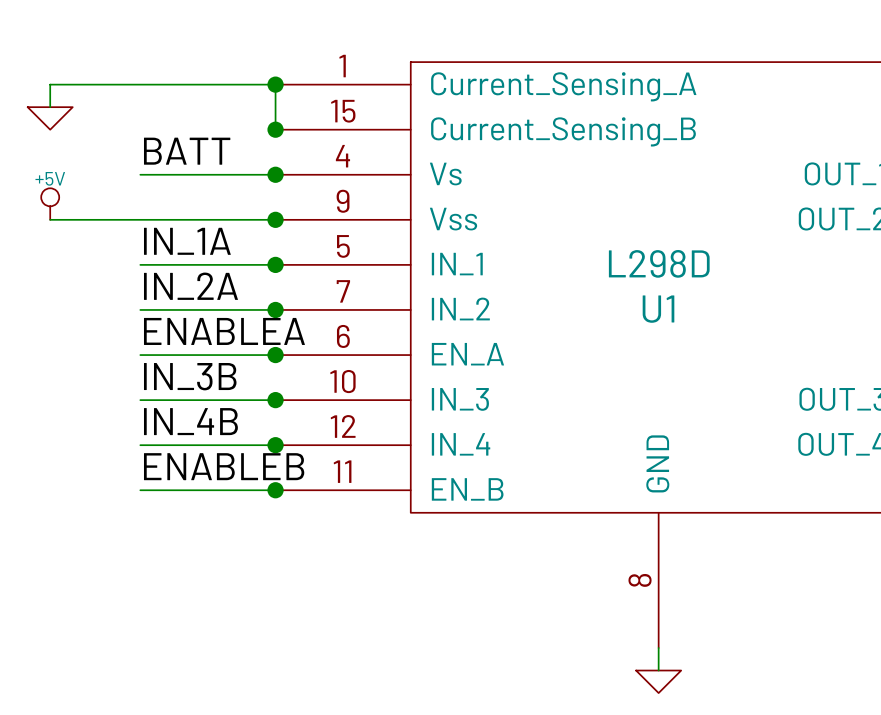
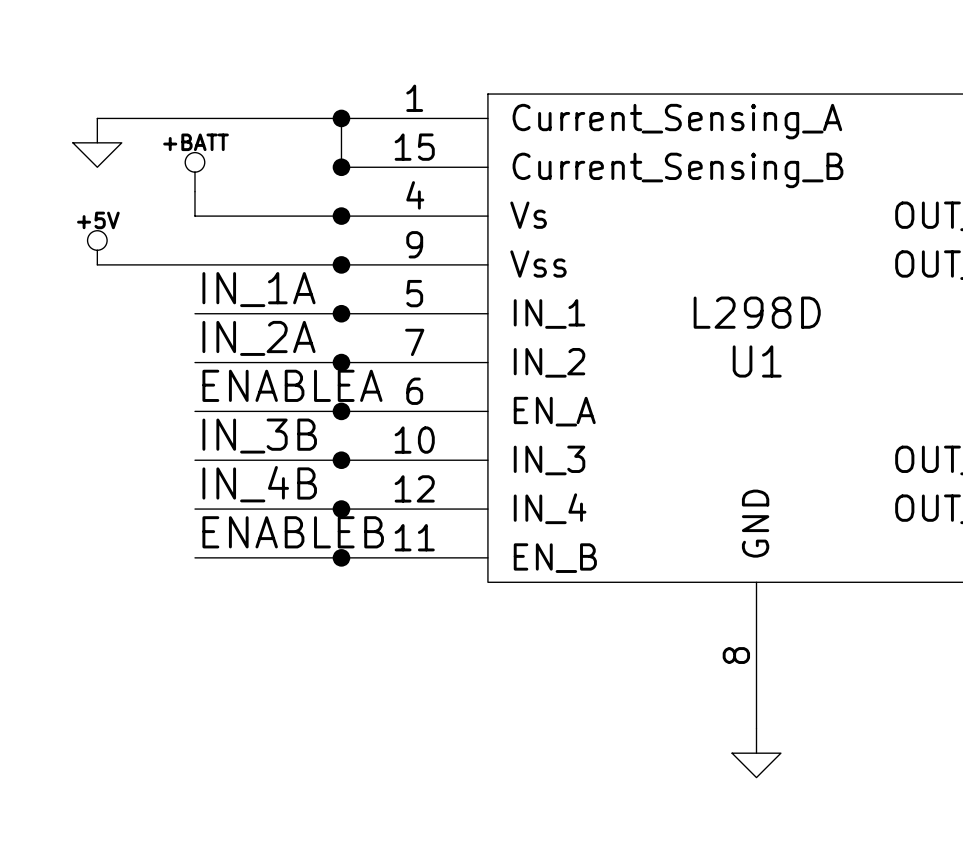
power symbol: none -> +BATT (194, 172)
label: BATT (187, 151) -> none
wire: none -> (194, 191) (194, 216)

